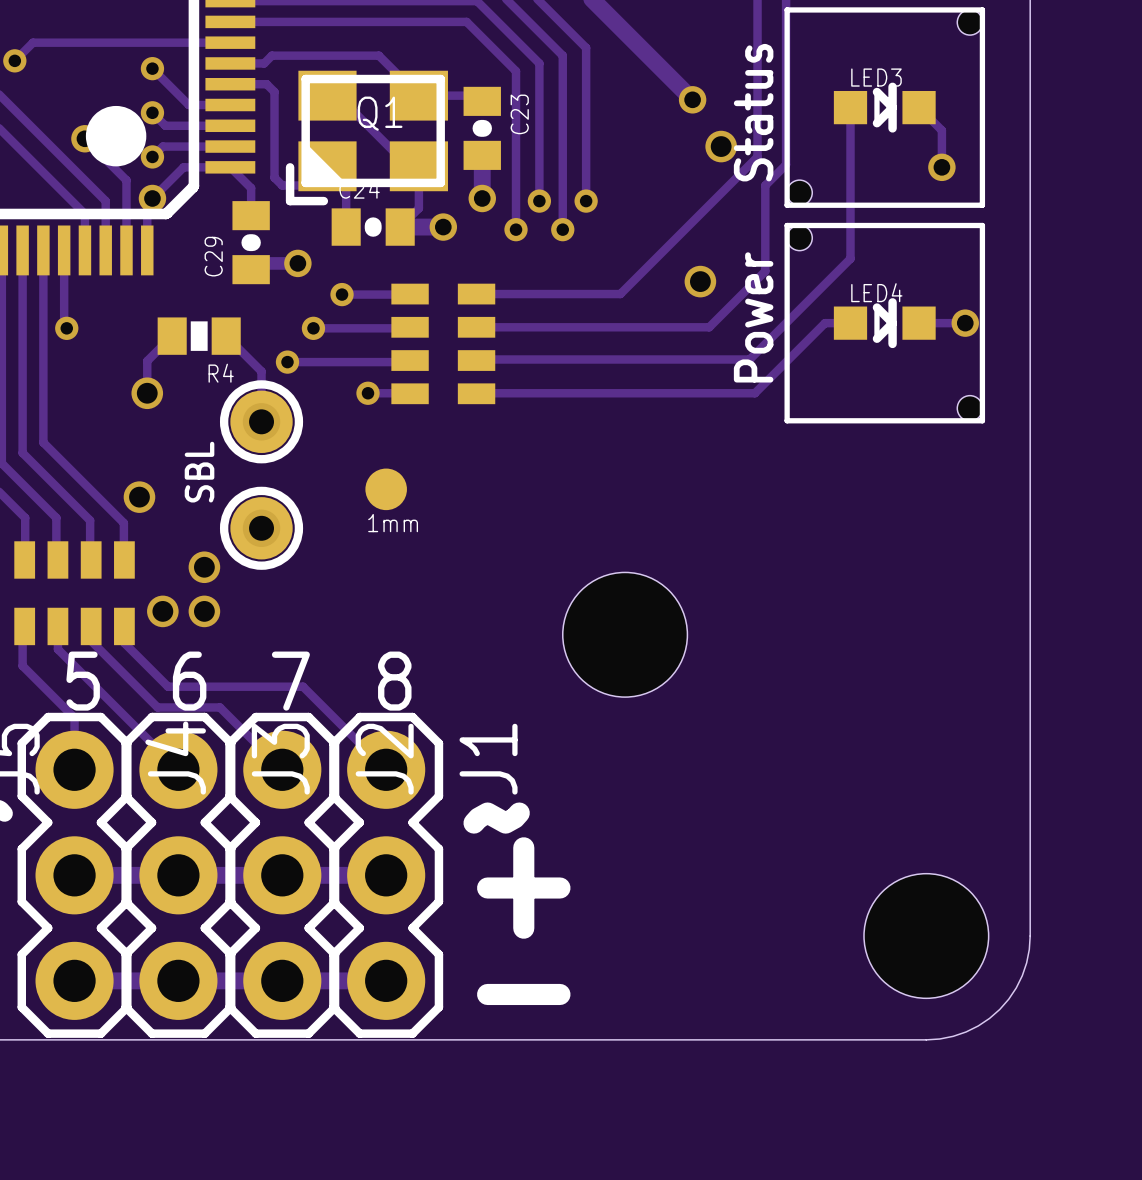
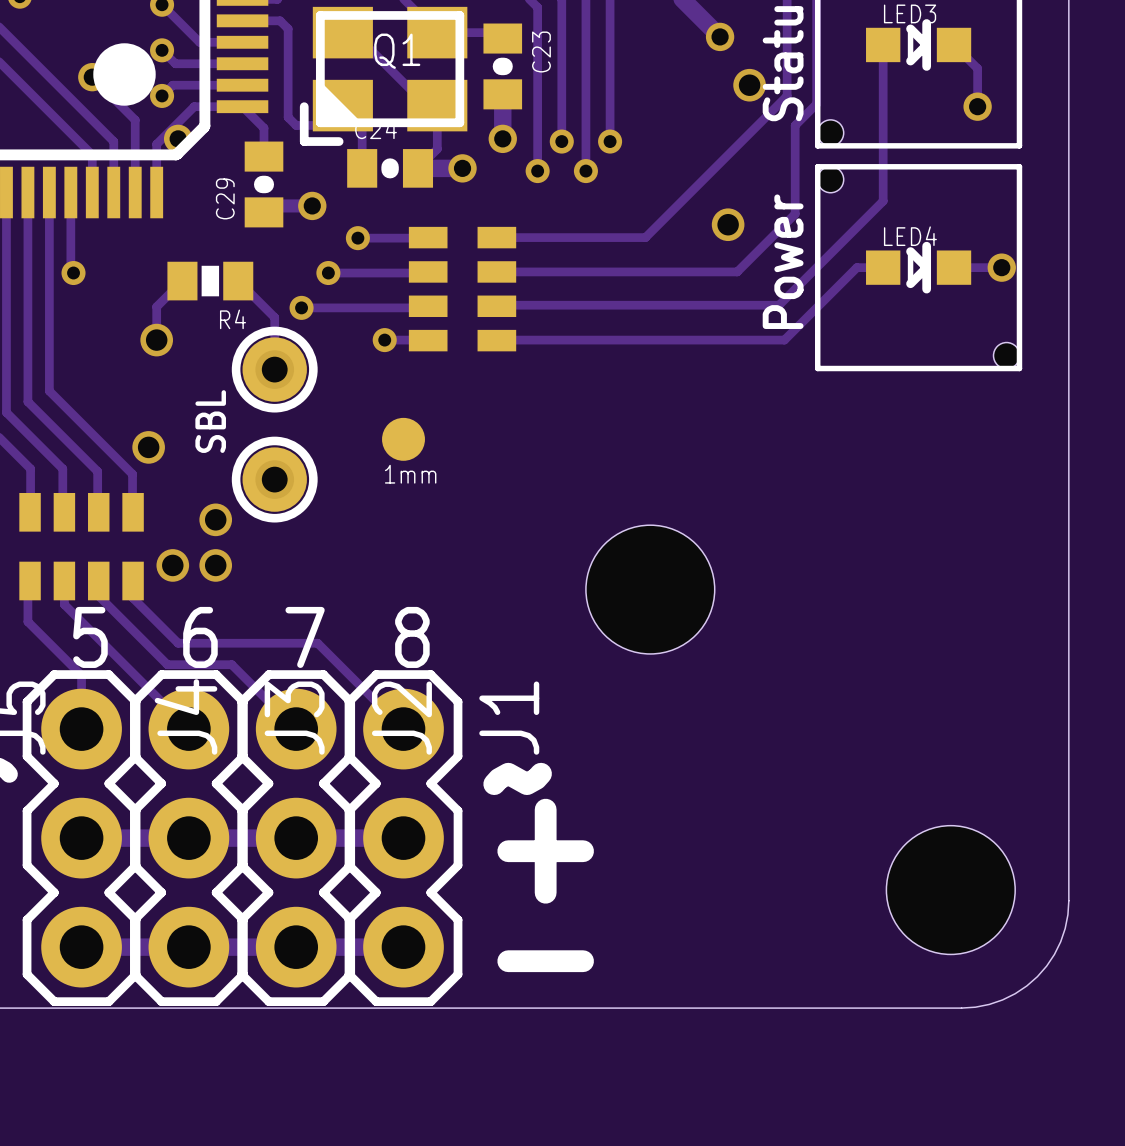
via position: (152, 198) -> (178, 138)
hole position: (926, 936) -> (950, 890)

